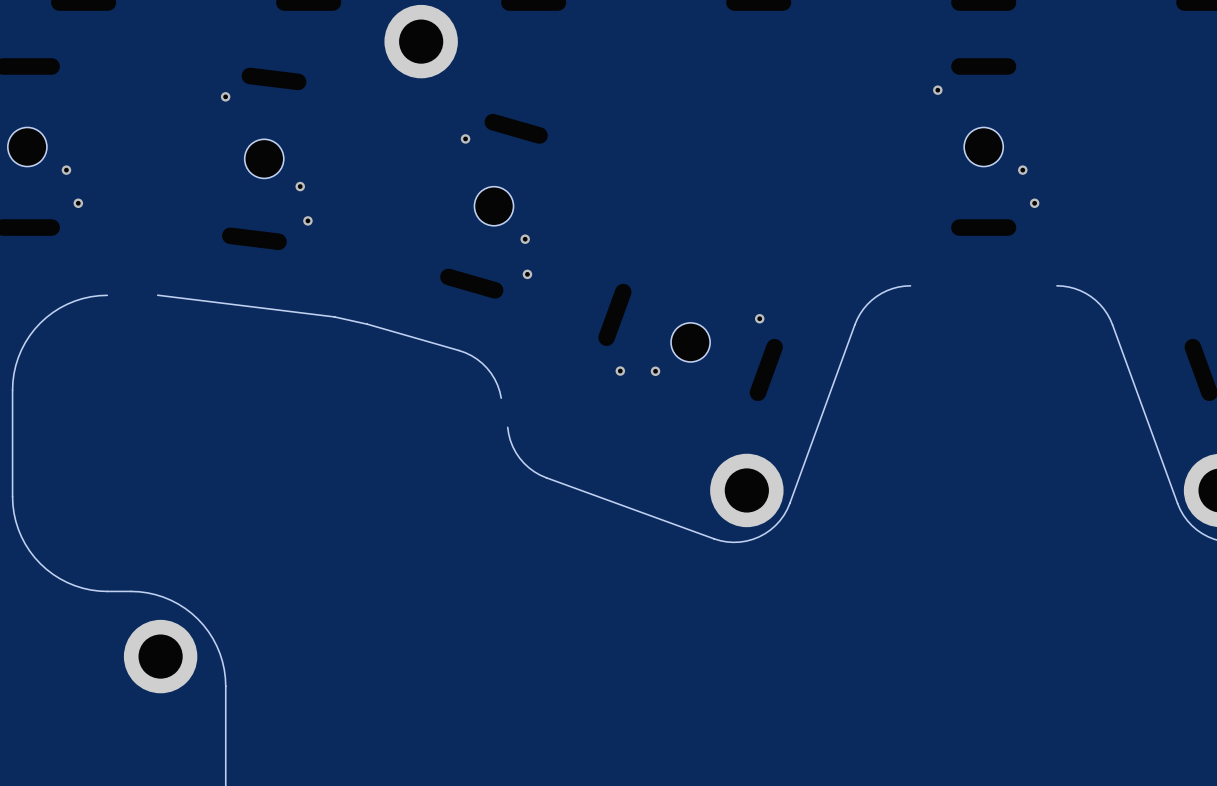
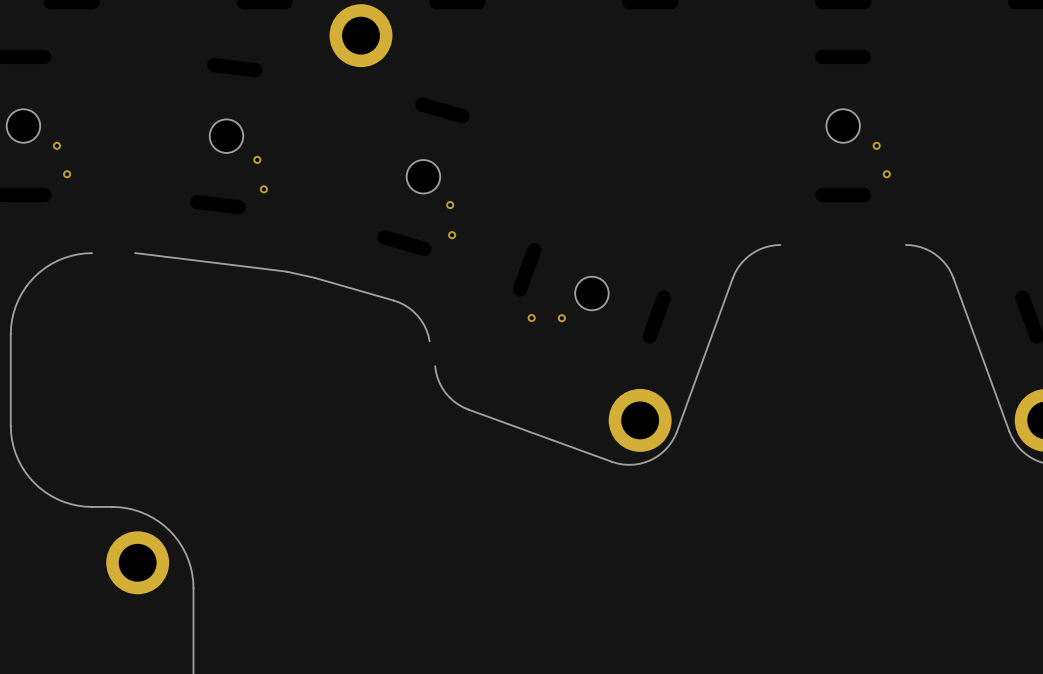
via: (937, 90) -> none
via: (225, 96) -> none
via: (465, 138) -> none
via: (759, 318) -> none

